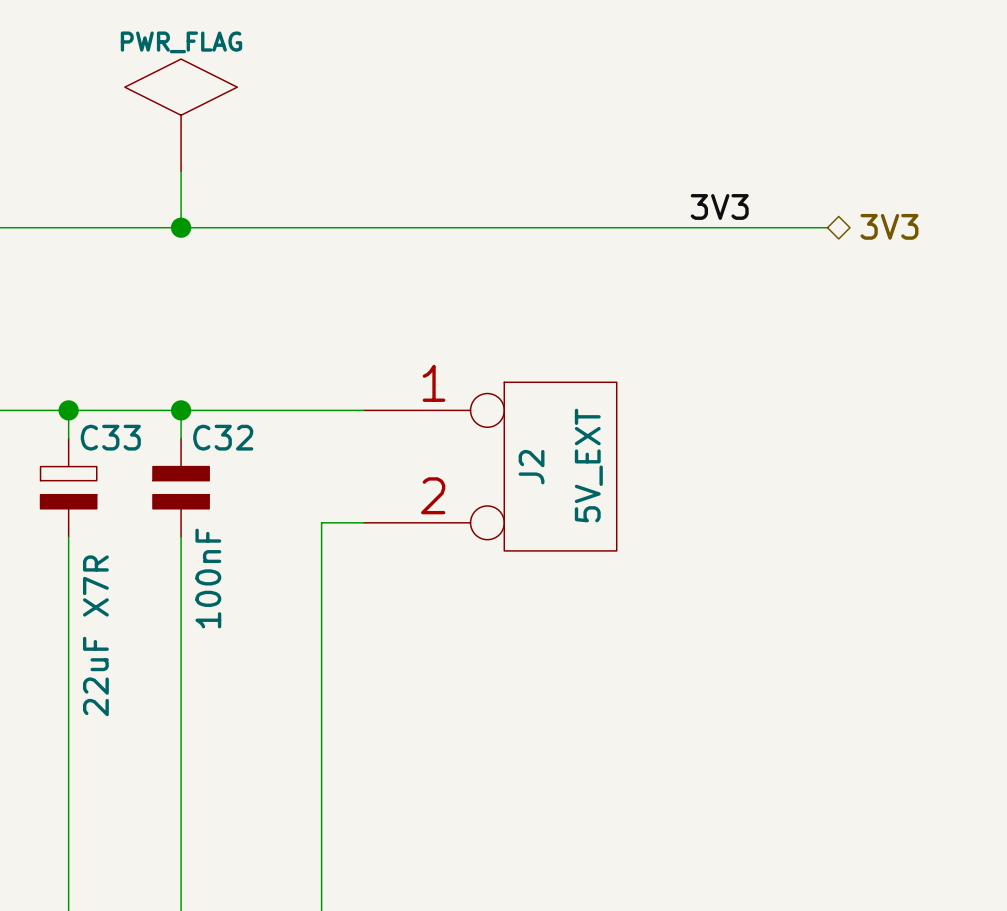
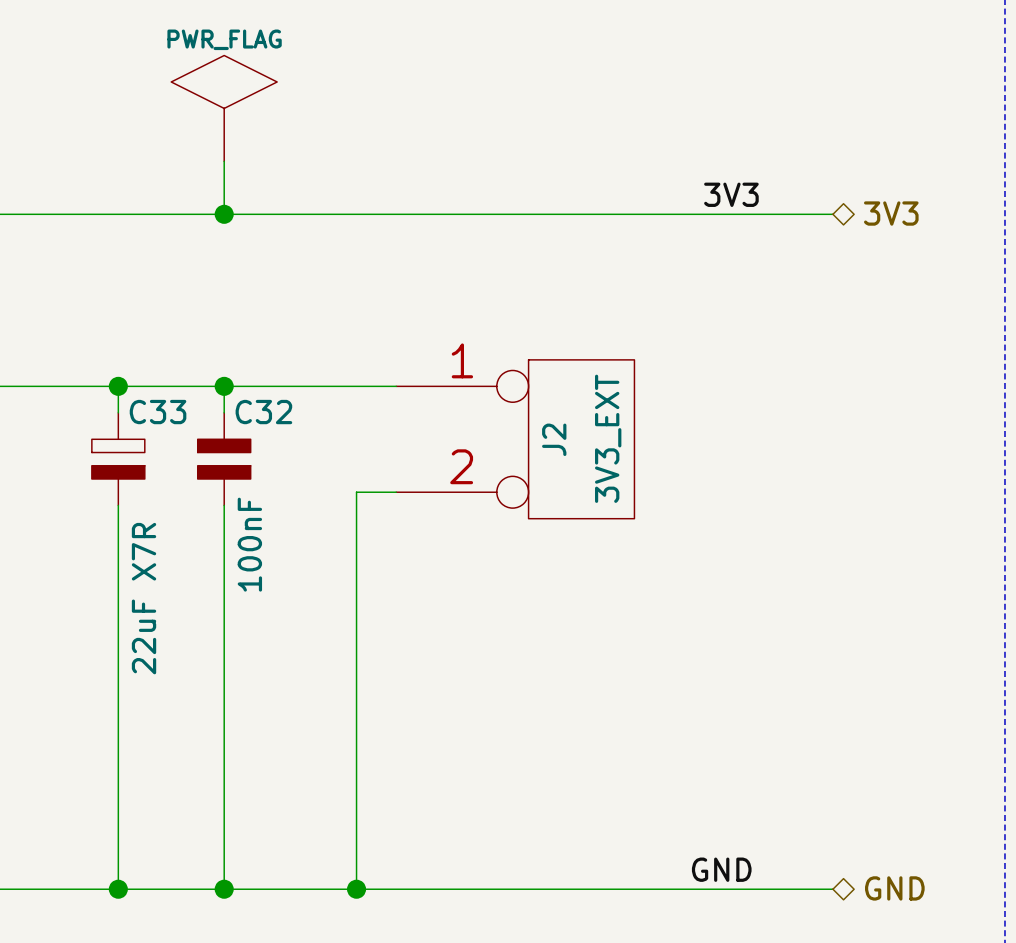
J2 value: 5V_EXT (588, 465) -> 3V3_EXT (608, 438)

